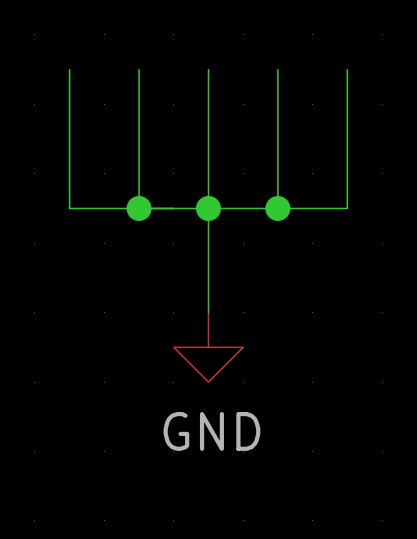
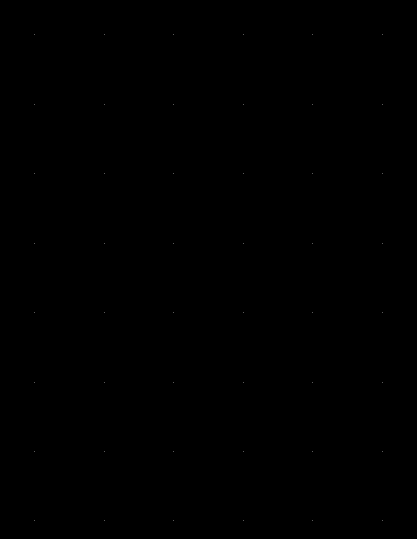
wire: (69, 69) (69, 208) (347, 208) (347, 69) -> none
wire: (139, 69) (139, 208) -> none
wire: (208, 69) (208, 312) -> none
wire: (277, 69) (277, 208) -> none
junction: (139, 208) -> none
junction: (208, 208) -> none
junction: (277, 208) -> none
power symbol: GND (208, 347) -> none

